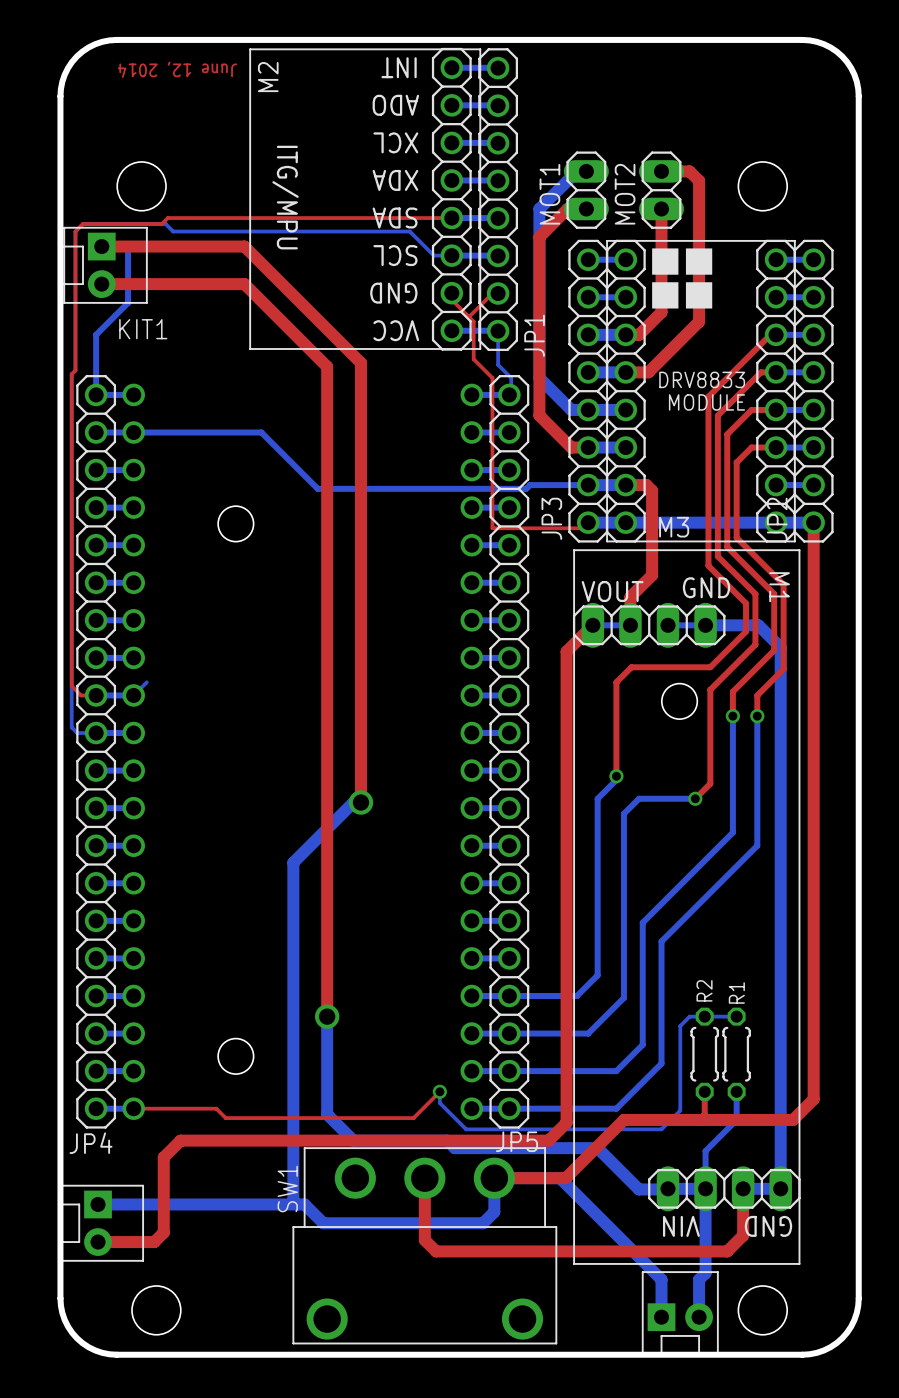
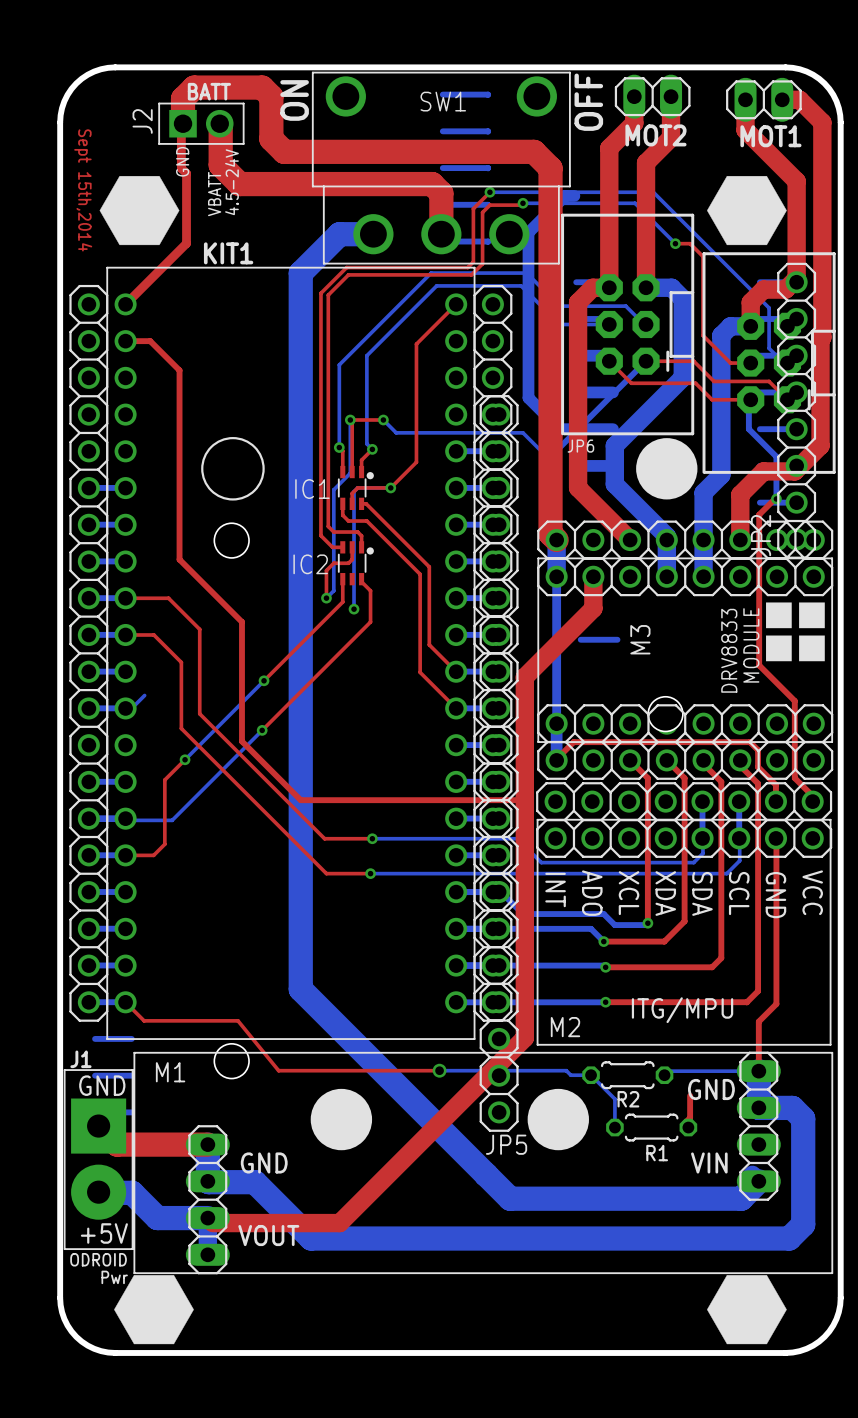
M2 footprint: [249, 47, 482, 351] -> [536, 818, 833, 1046]
text: June 12, 2014 (177, 69) -> BATT (209, 91)
top track: none -> (634, 96) (634, 123) (609, 148) (609, 287) (592, 287) (578, 302) (578, 487) (630, 539)
top track: none -> (671, 96) (671, 137) (646, 162) (646, 287)
text: none -> ON (294, 100)
top track: none -> (745, 99) (745, 130) (796, 181) (796, 278) (785, 289) (763, 289) (750, 302) (750, 326)
top track: none -> (782, 99) (799, 99) (822, 122) (820, 445) (794, 471) (763, 471) (740, 494) (740, 540)
text: none -> OFF (588, 102)
M2 name position: M2 (268, 77) -> M2 (565, 1027)
J2: none -> (201, 123)
top track: none -> (219, 123) (220, 165) (239, 184) (432, 184) (441, 193) (441, 234)
text: none -> Sept 15th,2014 (83, 190)
bottom track: none -> (489, 192) (653, 192) (769, 307) (769, 348) (783, 363) (787, 363)
via: none -> (489, 192)
top track: (661, 171) (689, 171) (699, 180) (699, 321) (648, 372) (625, 372) -> none
bottom track: none -> (522, 203) (635, 203) (675, 243)
top track: none -> (522, 203) (521, 205) (489, 205) (482, 212) (482, 263) (471, 274) (348, 274) (328, 295) (328, 526) (333, 532) (357, 532) (361, 535) (361, 547)
via: none -> (522, 203)
part: none -> (139, 210)
part: none -> (746, 210)
MOT1 rotation: 0° (586, 190) -> 90° clockwise (763, 99)
MOT1 position: (586, 190) -> (763, 99)
MOT2 rotation: 0° (661, 190) -> 90° clockwise (652, 96)
MOT2 position: (661, 190) -> (652, 96)
MOT1 name position: MOT1 (549, 194) -> MOT1 (770, 136)
MOT2 name position: MOT2 (625, 194) -> MOT2 (655, 135)
JP1: (498, 199) -> none
top track: (586, 208) (567, 208) (539, 237) (539, 415) (571, 447) (588, 447) -> none
top track: (661, 208) (661, 312) (638, 334) (625, 334) -> none
bottom track: none -> (373, 234) (339, 234) (300, 273) (300, 989) (510, 1198) (741, 1198) (758, 1181) (752, 1174)
top track: (451, 218) (167, 218) (161, 224) (82, 224) (75, 231) (75, 370) (71, 374) (71, 686) (81, 695) (96, 695) (98, 697) -> none
top track: none -> (675, 243) (690, 243) (702, 256) (702, 335) (730, 363) (750, 363)
via: none -> (675, 243)
M3 footprint: [605, 239, 797, 543] -> [537, 557, 834, 744]
bottom track: (101, 246) (124, 246) (128, 250) (128, 302) (96, 334) (96, 394) (133, 394) (135, 396) -> none
top track: (101, 246) (244, 246) (360, 363) (360, 802) -> none
bottom track: (498, 255) (433, 255) (409, 231) (173, 231) (165, 224) (82, 224) (75, 231) (75, 370) (71, 374) (71, 727) (77, 733) (133, 733) -> none
part: (105, 265) -> none
bottom track: none -> (646, 287) (671, 287) (682, 298) (682, 377) (614, 445) (614, 484) (666, 536) (666, 576)
top track: none -> (125, 304) (186, 243) (186, 173) (181, 168) (181, 125) (183, 123) (183, 98) (194, 87) (262, 87) (271, 96) (271, 139) (284, 151) (534, 151) (550, 168) (550, 533) (556, 540)
top track: none -> (456, 304) (416, 344) (416, 462) (390, 487) (357, 487) (352, 493) (352, 503)
top track: (101, 284) (244, 284) (327, 366) -> (489, 192) (473, 208) (473, 262) (467, 267) (346, 267) (320, 293) (320, 386)
top track: (451, 293) (451, 299) (473, 321) (473, 359) (492, 378) (492, 528) (586, 528) (588, 522) -> none
top track: (498, 293) (492, 293) (468, 316) -> none
bottom track: none -> (609, 324) (559, 324) (521, 285) (436, 285) (366, 355) (366, 443) (372, 449)
JP6: none -> (627, 324)
bottom track: none -> (646, 324) (625, 306) (559, 306) (526, 273) (431, 273) (339, 364) (339, 447)
bottom track: none -> (750, 326) (730, 326) (721, 335) (721, 475) (703, 492) (703, 576)
top track: none -> (125, 341) (150, 341) (179, 370) (179, 559) (241, 622) (241, 741) (300, 800) (522, 800) (524, 798)
KIT1 name position: KIT1 (143, 329) -> KIT1 (228, 253)
bottom track: (451, 330) (498, 330) (498, 364) (511, 378) (511, 393) (509, 394) (471, 394) -> none
top track: (776, 334) (770, 334) (708, 396) (708, 565) (746, 603) (746, 631) (710, 667) (631, 667) (616, 682) (616, 776) -> none
top track: none -> (609, 361) (631, 383) (695, 383) (712, 399) (750, 399)
bottom track: none -> (646, 361) (550, 456)
top track: none -> (646, 361) (693, 361) (713, 381) (769, 381) (787, 399)
part: none -> (769, 363)
top track width: thick (327, 366) (327, 518) -> thin (320, 386) (320, 535)
top track: (776, 372) (761, 372) (717, 415) (717, 556) (755, 594) (755, 644) (710, 689) (710, 783) (695, 798) -> none
bottom track: none -> (750, 399) (748, 401) (748, 429) (776, 456) (776, 498)
KIT1 footprint: [122, 383, 484, 1120] -> [106, 266, 476, 1040]
JP3: (588, 391) -> none
bottom track: none -> (350, 419) (350, 473) (333, 489) (333, 590) (326, 598)
via: none -> (350, 419)
bottom track: none -> (383, 419) (396, 432) (522, 432) (546, 456) (550, 456)
top track: none -> (383, 419) (350, 419) (352, 421) (352, 472)
via: none -> (383, 419)
top track: (776, 409) (751, 409) (727, 434) (727, 547) (774, 594) (774, 650) (732, 691) (732, 716) -> none
drawing: none -> [201, 437, 265, 501]
drawing: none -> [636, 438, 698, 500]
top track: none -> (339, 447) (342, 451) (342, 472)
via: none -> (339, 447)
top track: none -> (372, 449) (361, 460) (361, 472)
via: none -> (372, 449)
bottom track: (96, 432) (261, 432) (317, 488) (526, 488) (530, 485) (625, 485) -> none
bottom track: none -> (550, 456) (550, 533) (556, 540) (556, 760)
top track: (776, 447) (751, 447) (736, 462) (736, 537) (783, 584) (783, 669) (757, 695) (757, 716) -> none
IC1: none -> (355, 487)
bottom track: none -> (390, 487) (357, 487) (354, 491) (354, 609)
via: none -> (390, 487)
top track: none -> (776, 498) (759, 514) (759, 665) (794, 700) (794, 778) (812, 796) (812, 801)
via: none -> (776, 498)
top track: (625, 485) (646, 485) (652, 490) (652, 575) (630, 596) (630, 625) -> none
top track: none -> (342, 503) (342, 515) (348, 521) (366, 521) (420, 574) (420, 672) (456, 708)
top track: none -> (361, 503) (366, 503) (429, 566) (429, 644) (456, 671)
top track: (327, 518) (327, 1016) -> (320, 535) (332, 547) (342, 547)
bottom track: (588, 522) (813, 522) -> none
top track: (813, 522) (813, 1099) (792, 1119) (623, 1119) (565, 1178) (494, 1178) -> none
part: none -> (685, 540)
M3 name position: M3 (674, 527) -> M3 (640, 639)
top track: none -> (352, 547) (352, 559) (348, 563) (333, 563) (326, 570) (326, 598)
IC2: none -> (355, 563)
M1 footprint: [572, 549, 801, 1265] -> [133, 1051, 834, 1275]
top track: none -> (593, 576) (593, 608) (524, 677) (524, 1038) (339, 1223) (212, 1223) (207, 1218)
top track: none -> (342, 579) (342, 602) (264, 680)
top track: none -> (361, 579) (361, 581) (370, 590) (370, 622) (262, 730)
via: none -> (326, 598)
top track: none -> (125, 598) (168, 598) (199, 629) (199, 713) (324, 838) (372, 838)
M1 name position: M1 (779, 587) -> M1 (170, 1072)
via: none -> (354, 609)
top track: none -> (125, 634) (153, 634) (181, 662) (181, 728) (326, 873) (370, 873)
top track: (592, 625) (566, 651) (566, 1122) (548, 1140) (180, 1140) (163, 1157) (163, 1232) (154, 1242) (98, 1242) -> none
bottom track: (668, 625) (758, 625) (780, 647) (780, 1188) (743, 1188) -> none
part: none -> (88, 653)
part: none -> (492, 653)
bottom track: none -> (264, 680) (185, 759)
via: none -> (264, 680)
bottom track: (732, 716) (732, 832) (642, 922) (642, 1044) (616, 1071) (471, 1071) -> none
via: (732, 716) -> none
bottom track: (757, 716) (757, 845) (661, 941) (661, 1063) (616, 1108) (471, 1108) -> none
via: (757, 716) -> none
bottom track: none -> (262, 730) (172, 820) (88, 818)
via: none -> (262, 730)
top track: none -> (185, 759) (164, 779) (164, 844) (153, 855) (125, 855)
via: none -> (185, 759)
top track: none -> (556, 760) (573, 742) (749, 742) (758, 750) (758, 767) (775, 785) (775, 801)
top track: none -> (630, 760) (647, 778) (647, 923)
top track: none -> (666, 760) (684, 778) (684, 921) (664, 941) (603, 941)
part: none -> (685, 760)
top track: none -> (703, 760) (703, 764) (721, 781) (721, 958) (712, 967) (605, 967)
top track: none -> (740, 760) (740, 765) (758, 783) (758, 991) (746, 1002)
JP4: (96, 751) -> none
bottom track: (616, 776) (616, 779) (597, 798) (597, 975) (576, 995) (471, 995) -> none
via: (616, 776) -> none
part: none -> (684, 801)
bottom track: none -> (702, 801) (702, 853) (693, 862) (541, 862) (517, 838) (372, 838)
bottom track: none -> (739, 801) (739, 860) (726, 873) (370, 873)
bottom track: (695, 798) (638, 798) (623, 813) (623, 997) (588, 1033) (471, 1033) -> none
via: (695, 798) -> none
bottom track: (360, 802) (353, 802) (293, 862) (293, 1200) (297, 1204) -> none
via: (360, 802) -> none
via: none -> (372, 838)
top track: none -> (776, 838) (776, 1004) (758, 1021) (758, 1071)
via: none -> (370, 873)
bottom track: none -> (456, 892) (501, 892) (522, 914) (603, 914) (614, 925) (646, 925) (647, 923)
via: none -> (647, 923)
bottom track: none -> (456, 928) (591, 928) (603, 941)
via: none -> (603, 941)
bottom track: none -> (456, 965) (603, 965) (605, 967)
via: none -> (605, 967)
R2 name position: R2 (704, 990) -> R2 (628, 1099)
R1 name position: R1 (736, 992) -> R1 (657, 1153)
top track: none -> (605, 1002) (746, 1002)
via: none -> (605, 1002)
top track: none -> (125, 1002) (144, 1020) (238, 1020) (278, 1070) (439, 1070)
bottom track: none -> (456, 1002) (605, 1002)
bottom track: (327, 1016) (327, 1114) (353, 1140) (447, 1140) (454, 1148) (597, 1148) (638, 1189) (705, 1188) -> none
via: (327, 1016) -> none
bottom track: (736, 1016) (689, 1016) (680, 1026) (680, 1110) (661, 1129) (466, 1129) (439, 1103) (439, 1091) -> none
R2 rotation: 0° (704, 1054) -> 90° clockwise (627, 1075)
R2 position: (704, 1054) -> (627, 1075)
R1 rotation: 0° (736, 1054) -> 90° clockwise (651, 1127)
R1 position: (736, 1054) -> (651, 1127)
bottom track: none -> (439, 1070) (566, 1070) (570, 1075) (591, 1075) (614, 1099) (614, 1127)
bottom track: none -> (664, 1075) (668, 1071) (758, 1071) (758, 1107) (792, 1107) (803, 1118) (803, 1224) (789, 1238) (311, 1238) (254, 1182) (208, 1182) (207, 1144)
drawing: none -> [310, 1088, 373, 1151]
drawing: none -> [527, 1088, 589, 1151]
top track: (439, 1091) (413, 1118) (225, 1118) (216, 1108) (133, 1108) -> none
via position: (439, 1091) -> (439, 1070)
bottom track: (736, 1091) (736, 1119) (705, 1151) (705, 1188) -> none
top track: none -> (98, 1126) (117, 1144) (207, 1144)
J1: none -> (98, 1159)
top track: (424, 1178) (424, 1240) (436, 1251) (727, 1251) (743, 1235) (743, 1188) -> none
bottom track: (705, 1188) (705, 1273) (699, 1279) (699, 1317) -> none
SW1 name position: SW1 (287, 1189) -> SW1 (443, 101)
bottom track: none -> (98, 1192) (132, 1192) (157, 1218) (207, 1218) (207, 1254)
bottom track: (98, 1204) (304, 1204) (323, 1223) (483, 1223) (494, 1211) (494, 1178) (560, 1178) (661, 1279) (661, 1317) -> none
part: (101, 1223) -> none
SW1 rotation: 0° (424, 1245) -> 180° (441, 168)
SW1 position: (424, 1245) -> (441, 168)
text: none -> ODROID (98, 1259)
text: none -> Pwr (114, 1277)
part: none -> (153, 1309)
part: none -> (746, 1309)
part: (680, 1313) -> none

